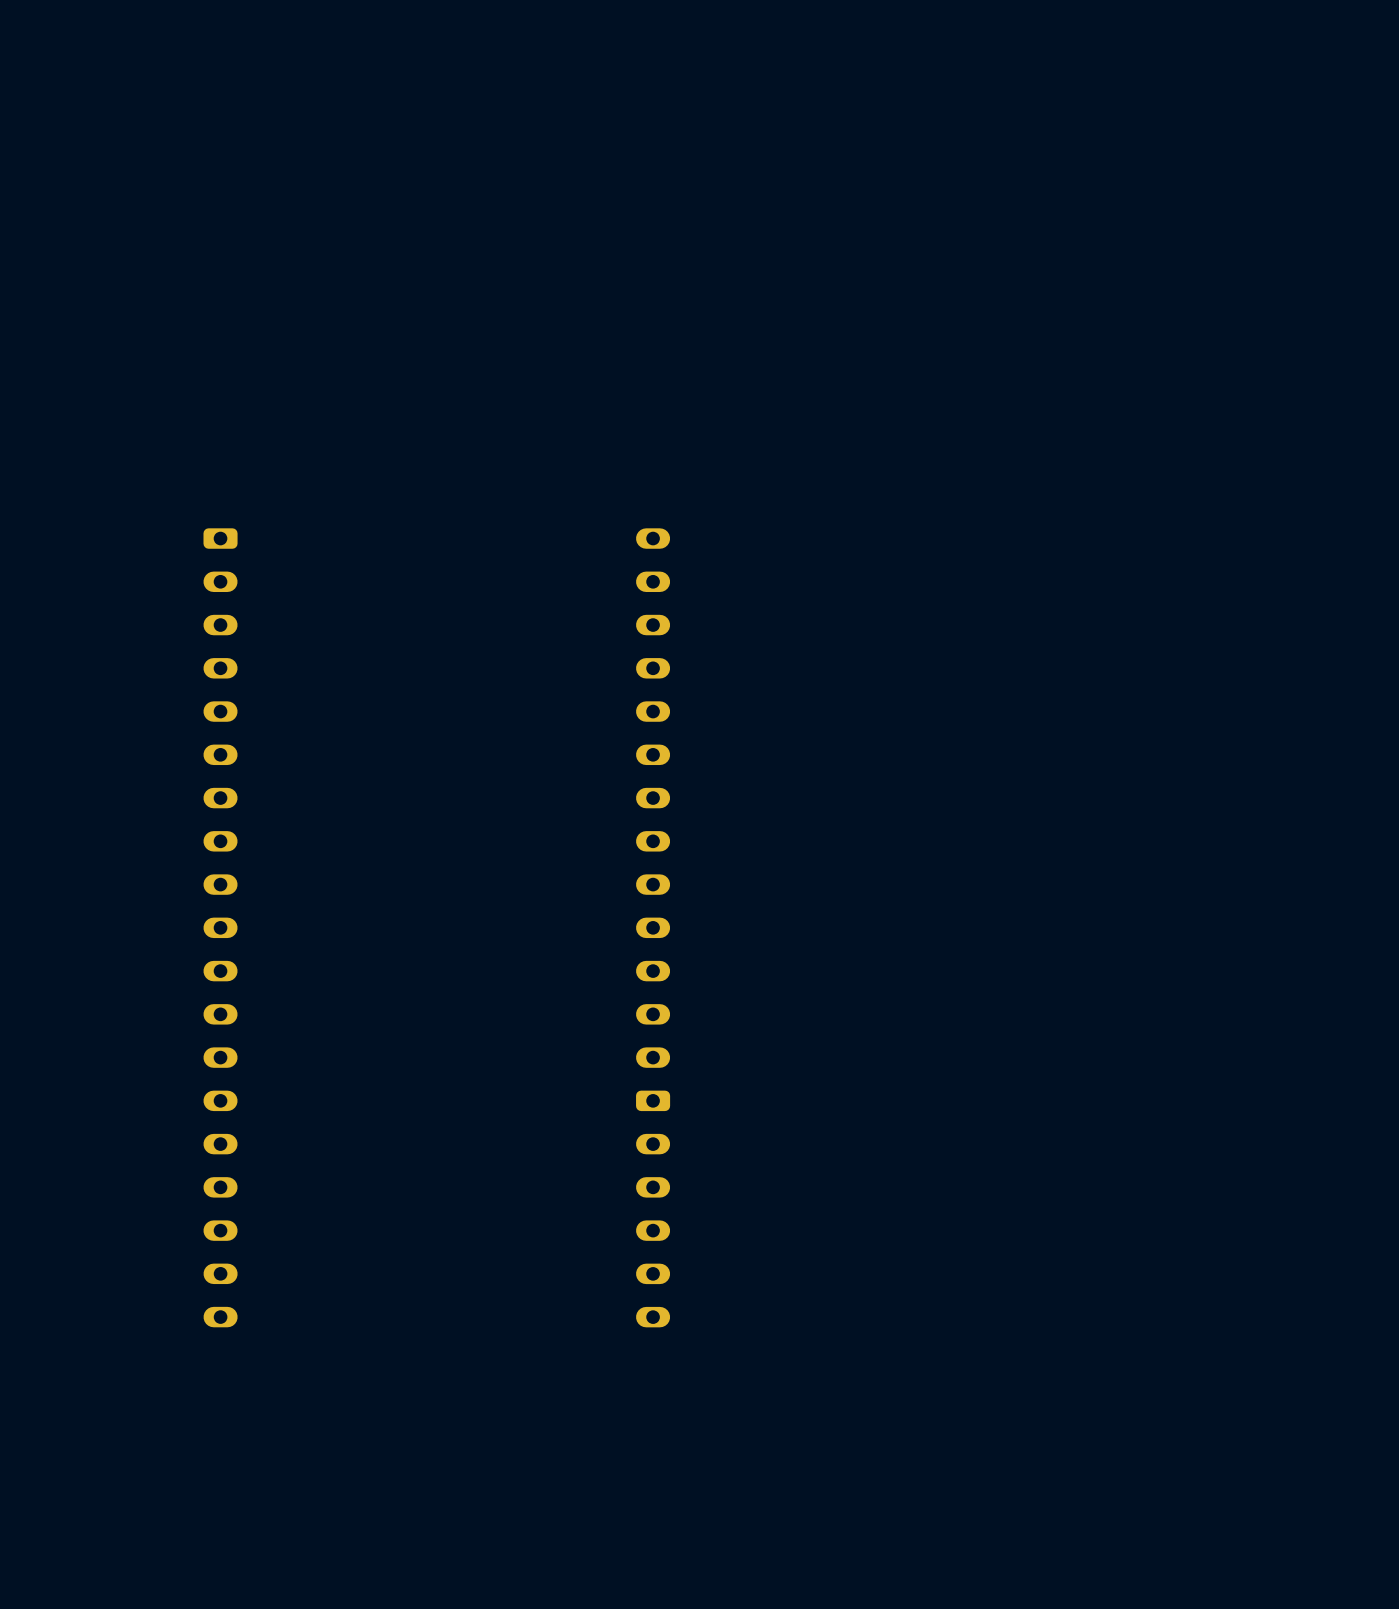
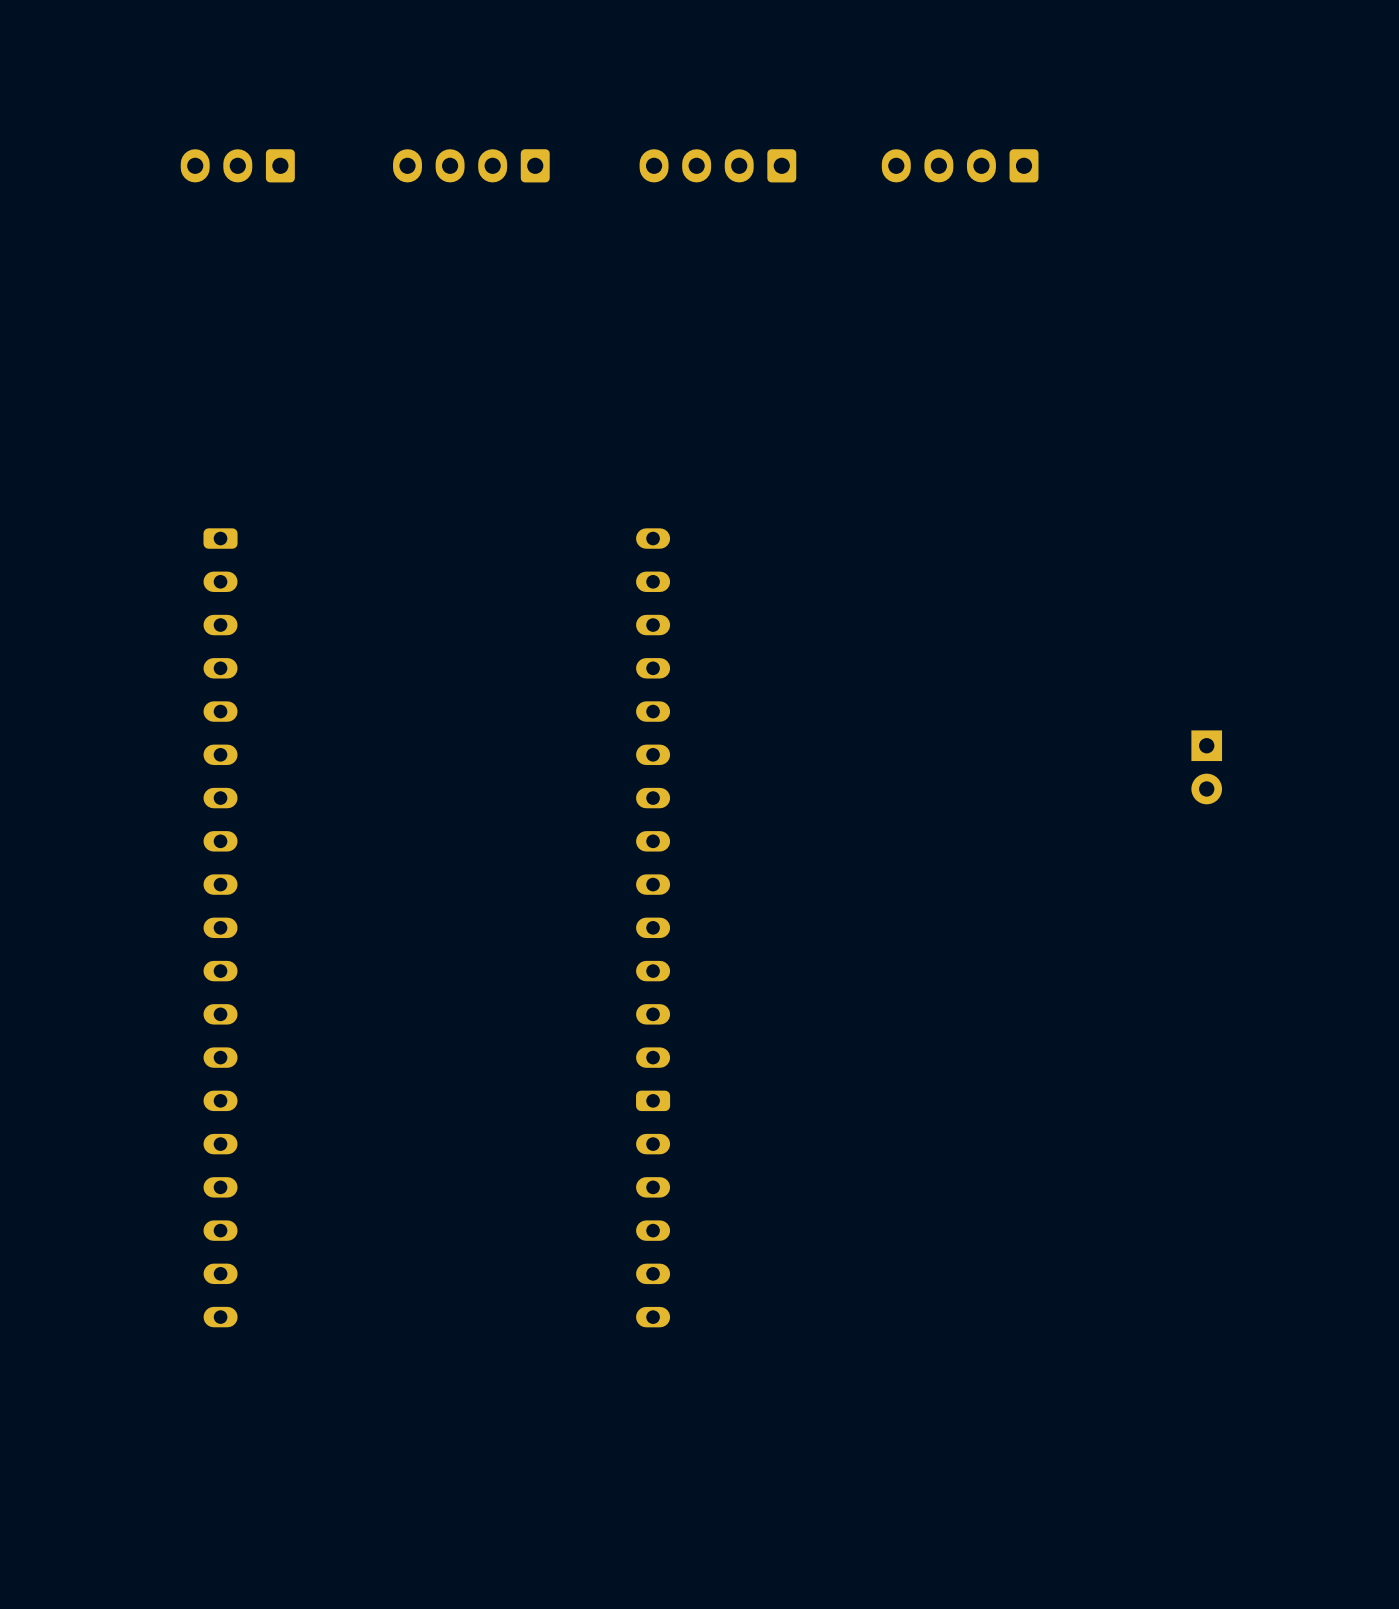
part: none -> (237, 165)
part: none -> (471, 165)
part: none -> (717, 165)
part: none -> (960, 165)
part: none -> (1206, 767)

